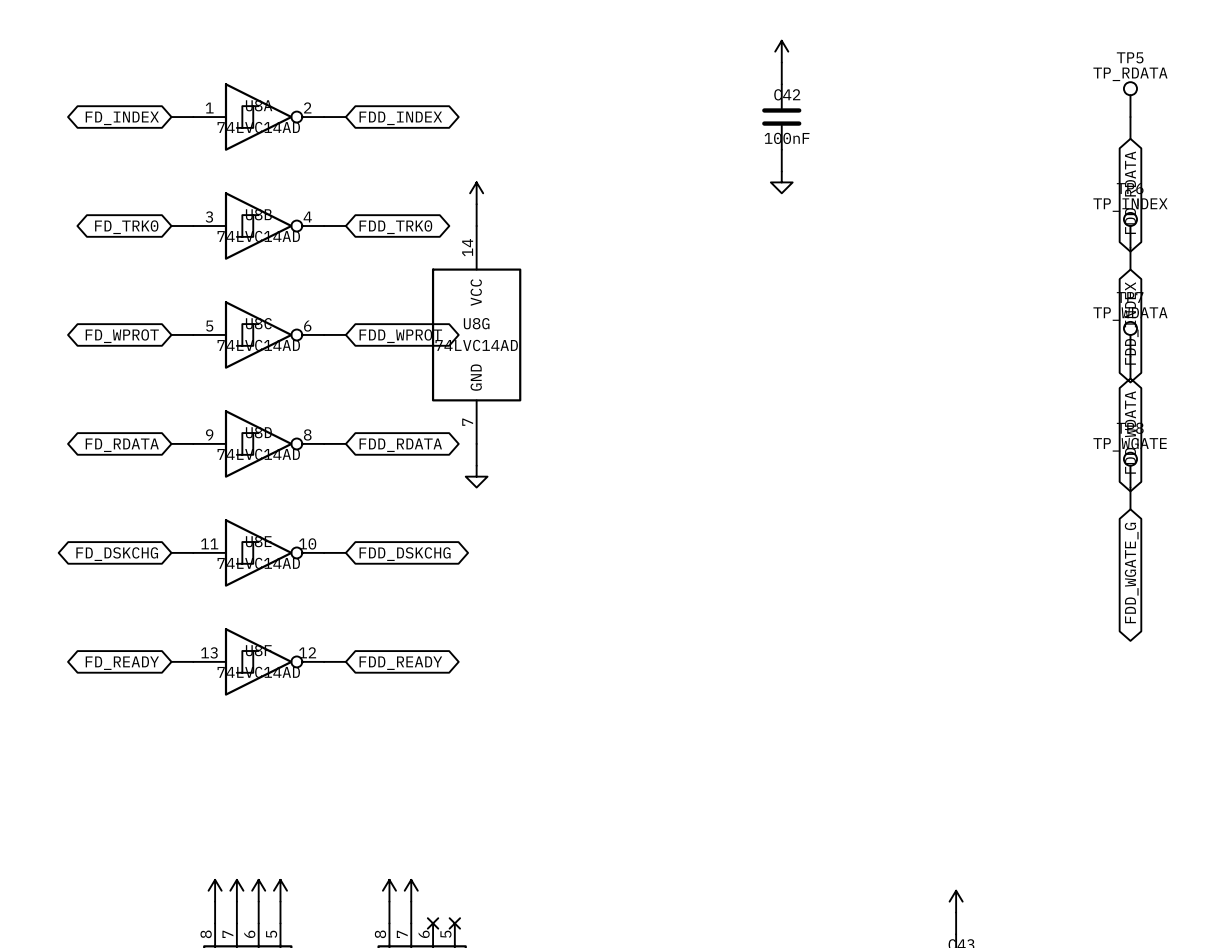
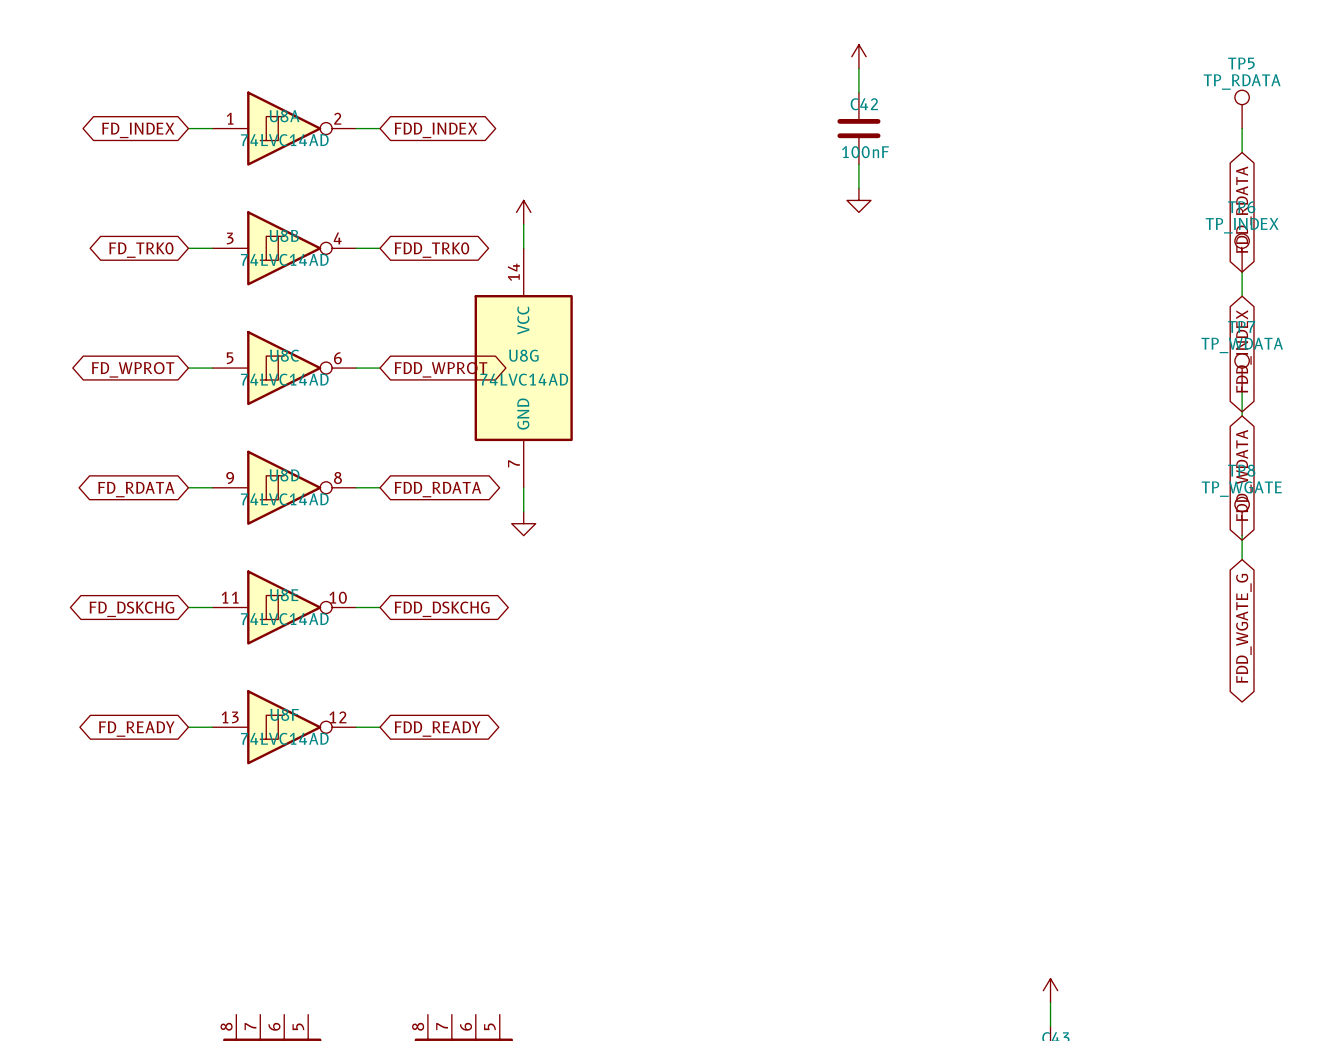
power symbol: (215, 890) -> none
power symbol: (236, 890) -> none
power symbol: (258, 890) -> none
power symbol: (280, 890) -> none
power symbol: (389, 890) -> none
power symbol: (411, 890) -> none
wire: (215, 901) (215, 923) -> none
wire: (236, 901) (236, 923) -> none
wire: (258, 901) (258, 923) -> none
wire: (280, 901) (280, 923) -> none
wire: (389, 901) (389, 923) -> none
wire: (411, 901) (411, 923) -> none
no-connect mark: (433, 923) -> none
no-connect mark: (454, 923) -> none

